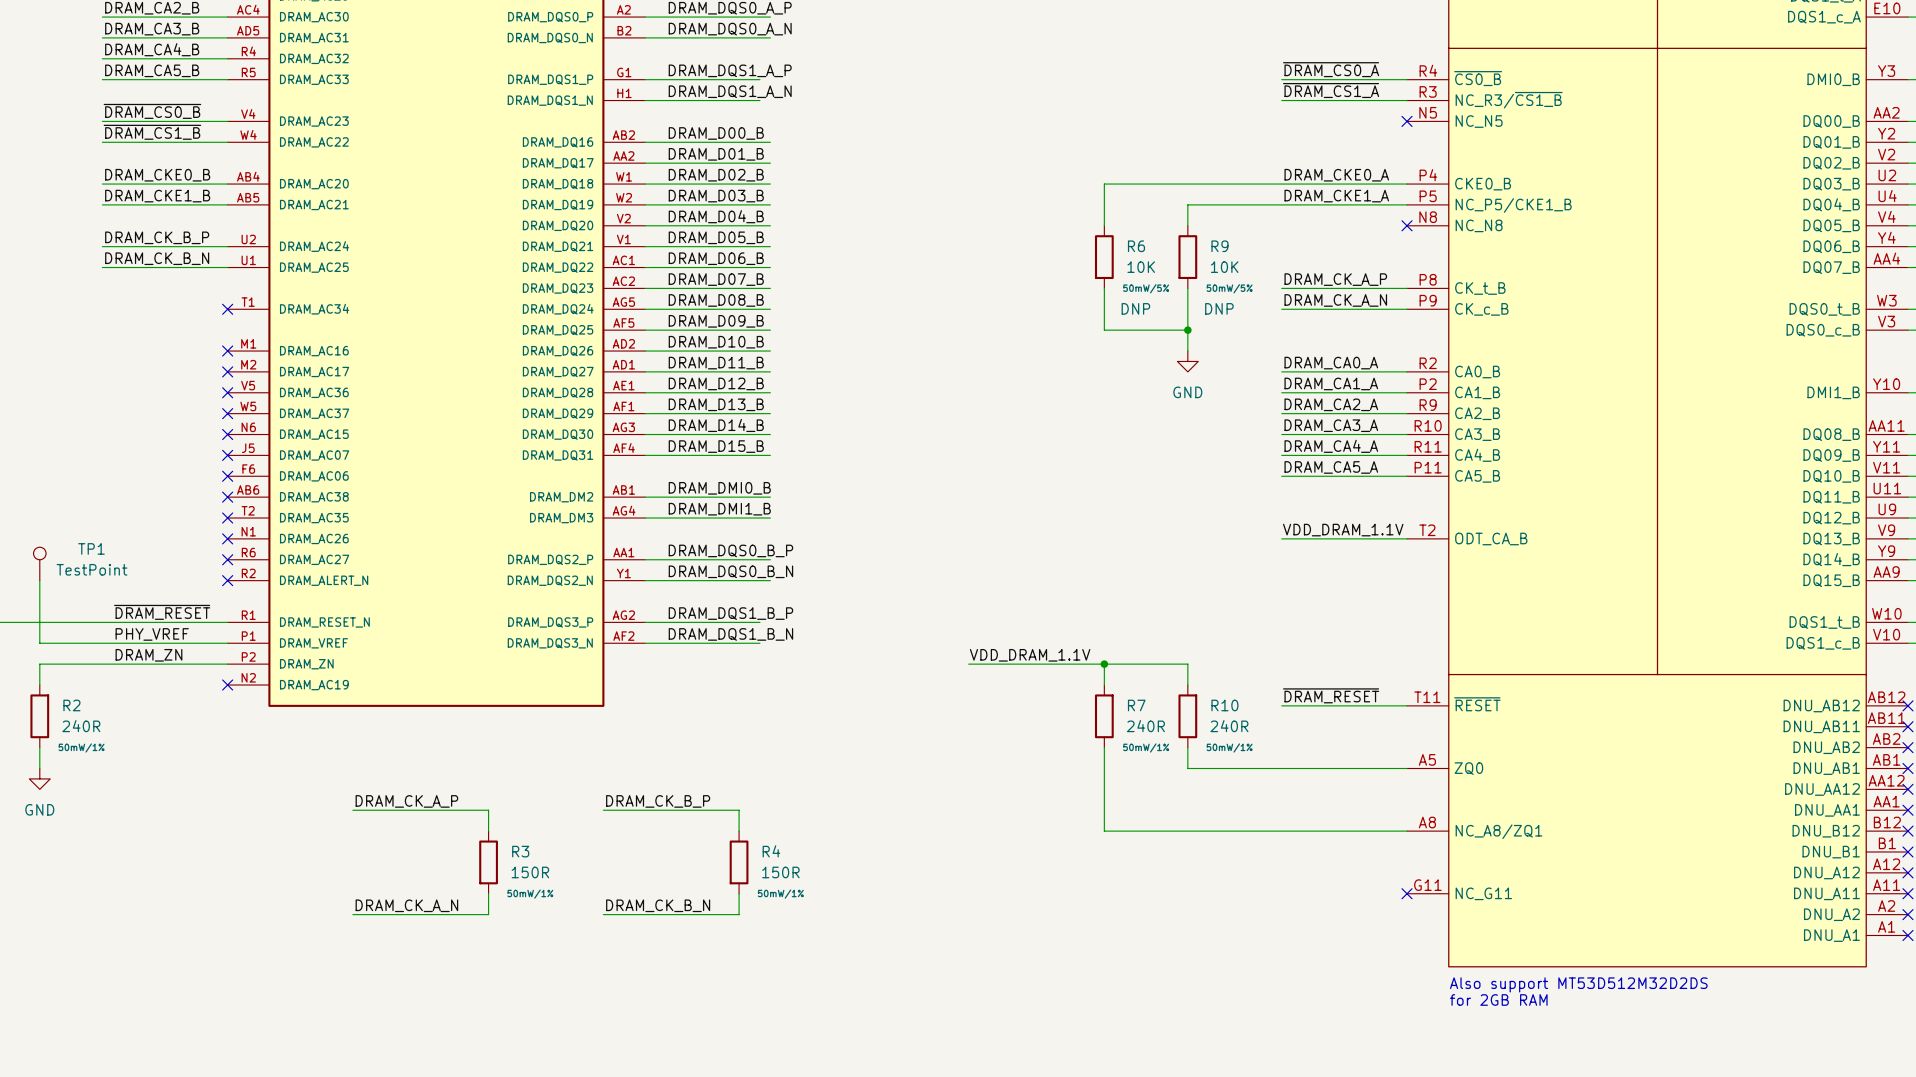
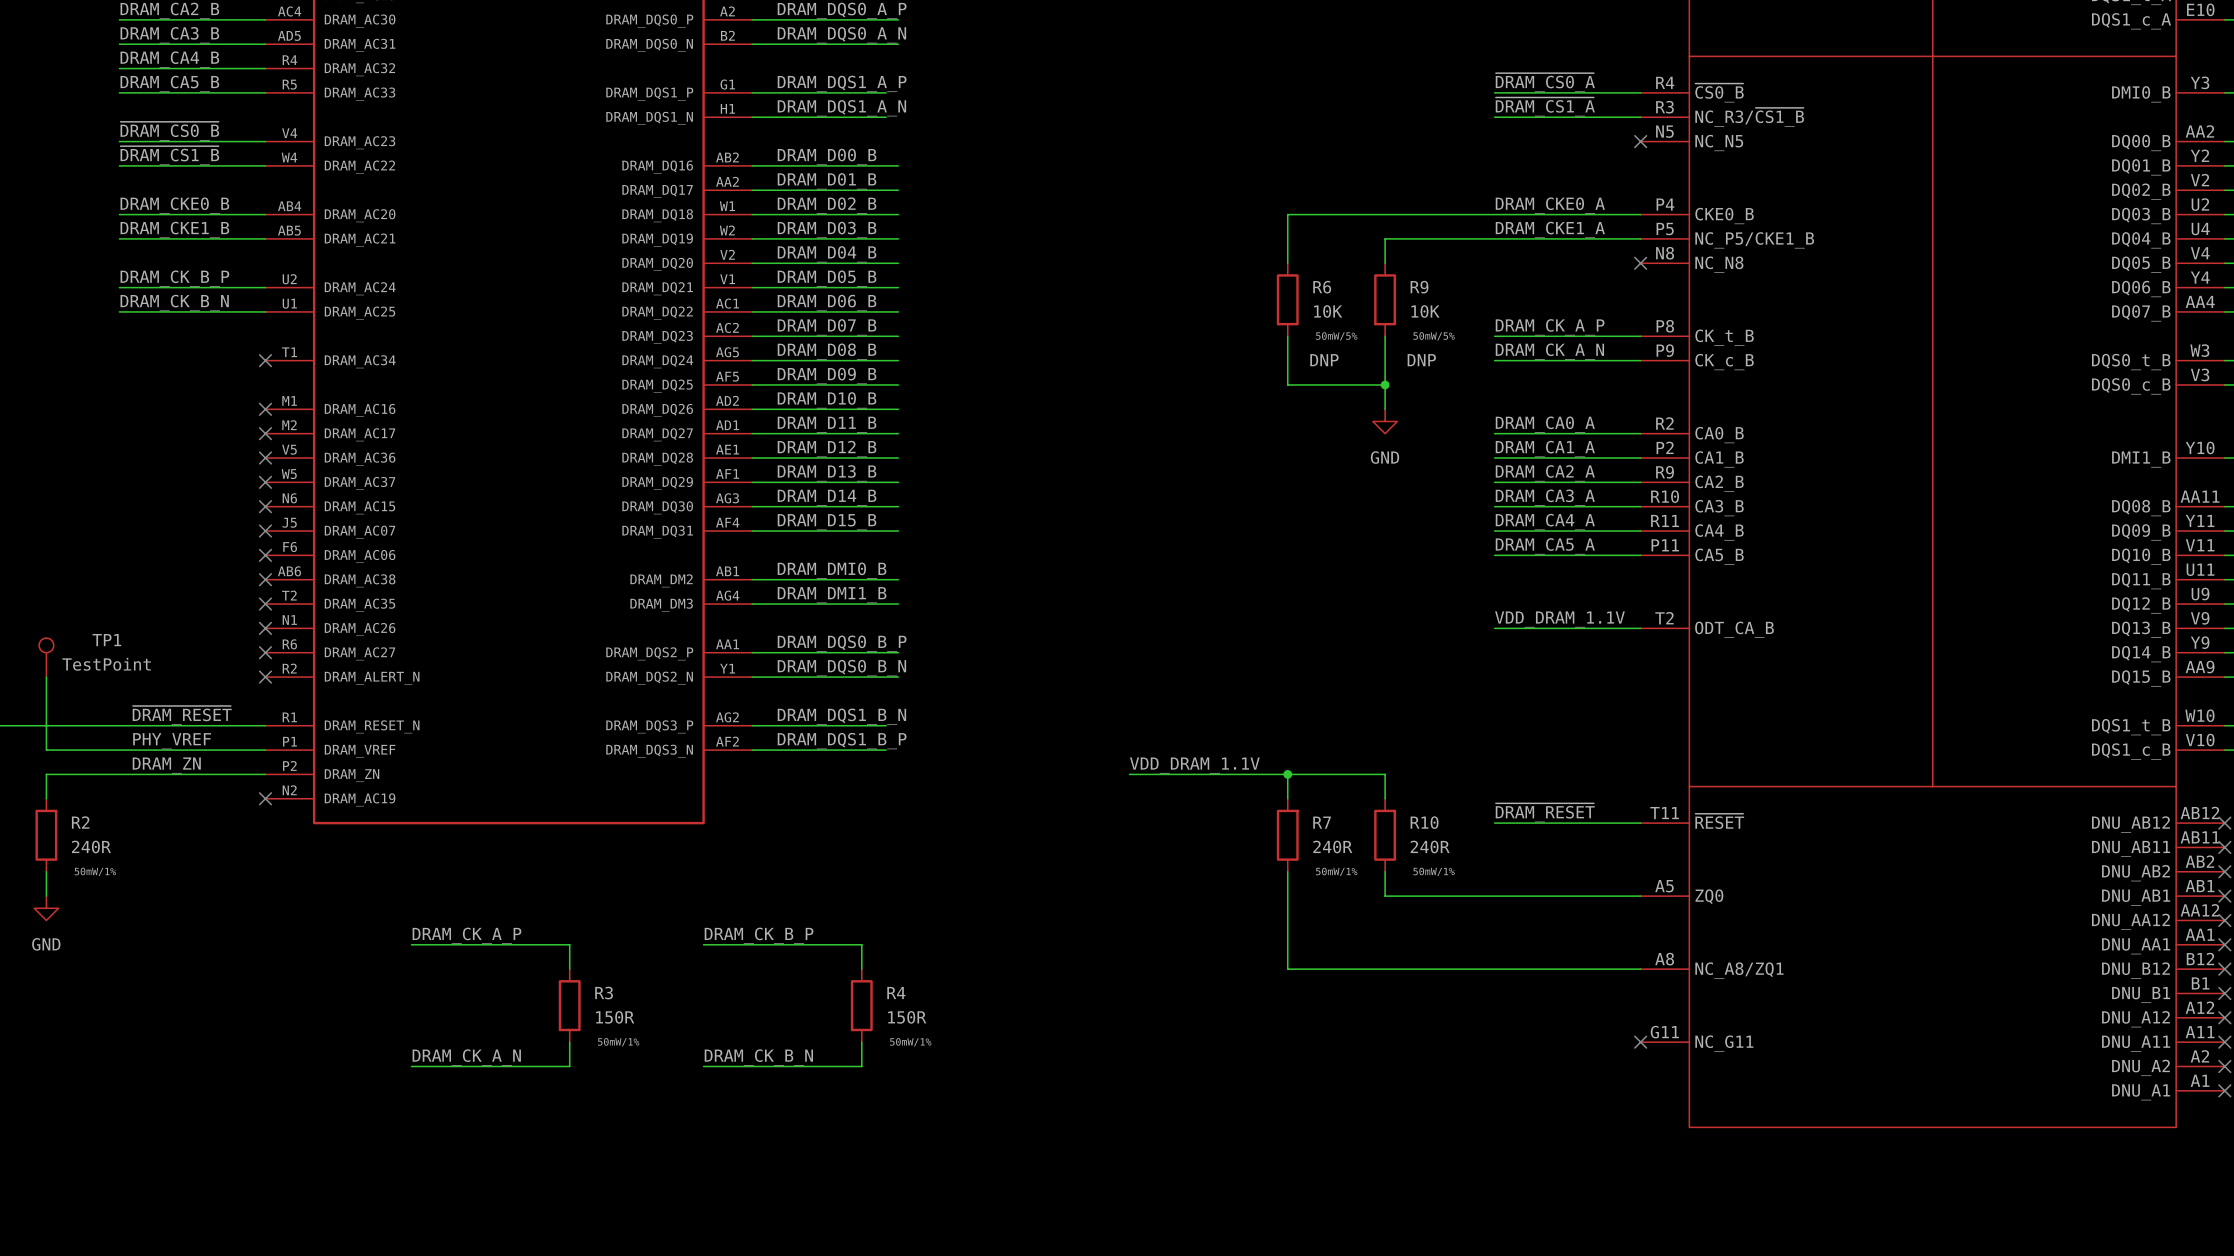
label: DRAM_DQS1_B_P (730, 613) -> DRAM_DQS1_B_N (841, 716)
label: DRAM_DQS1_B_N (730, 634) -> DRAM_DQS1_B_P (842, 741)
text: Also support MT53D512M32D2DS (1578, 984) -> none
text: for 2GB RAM (1498, 999) -> none

